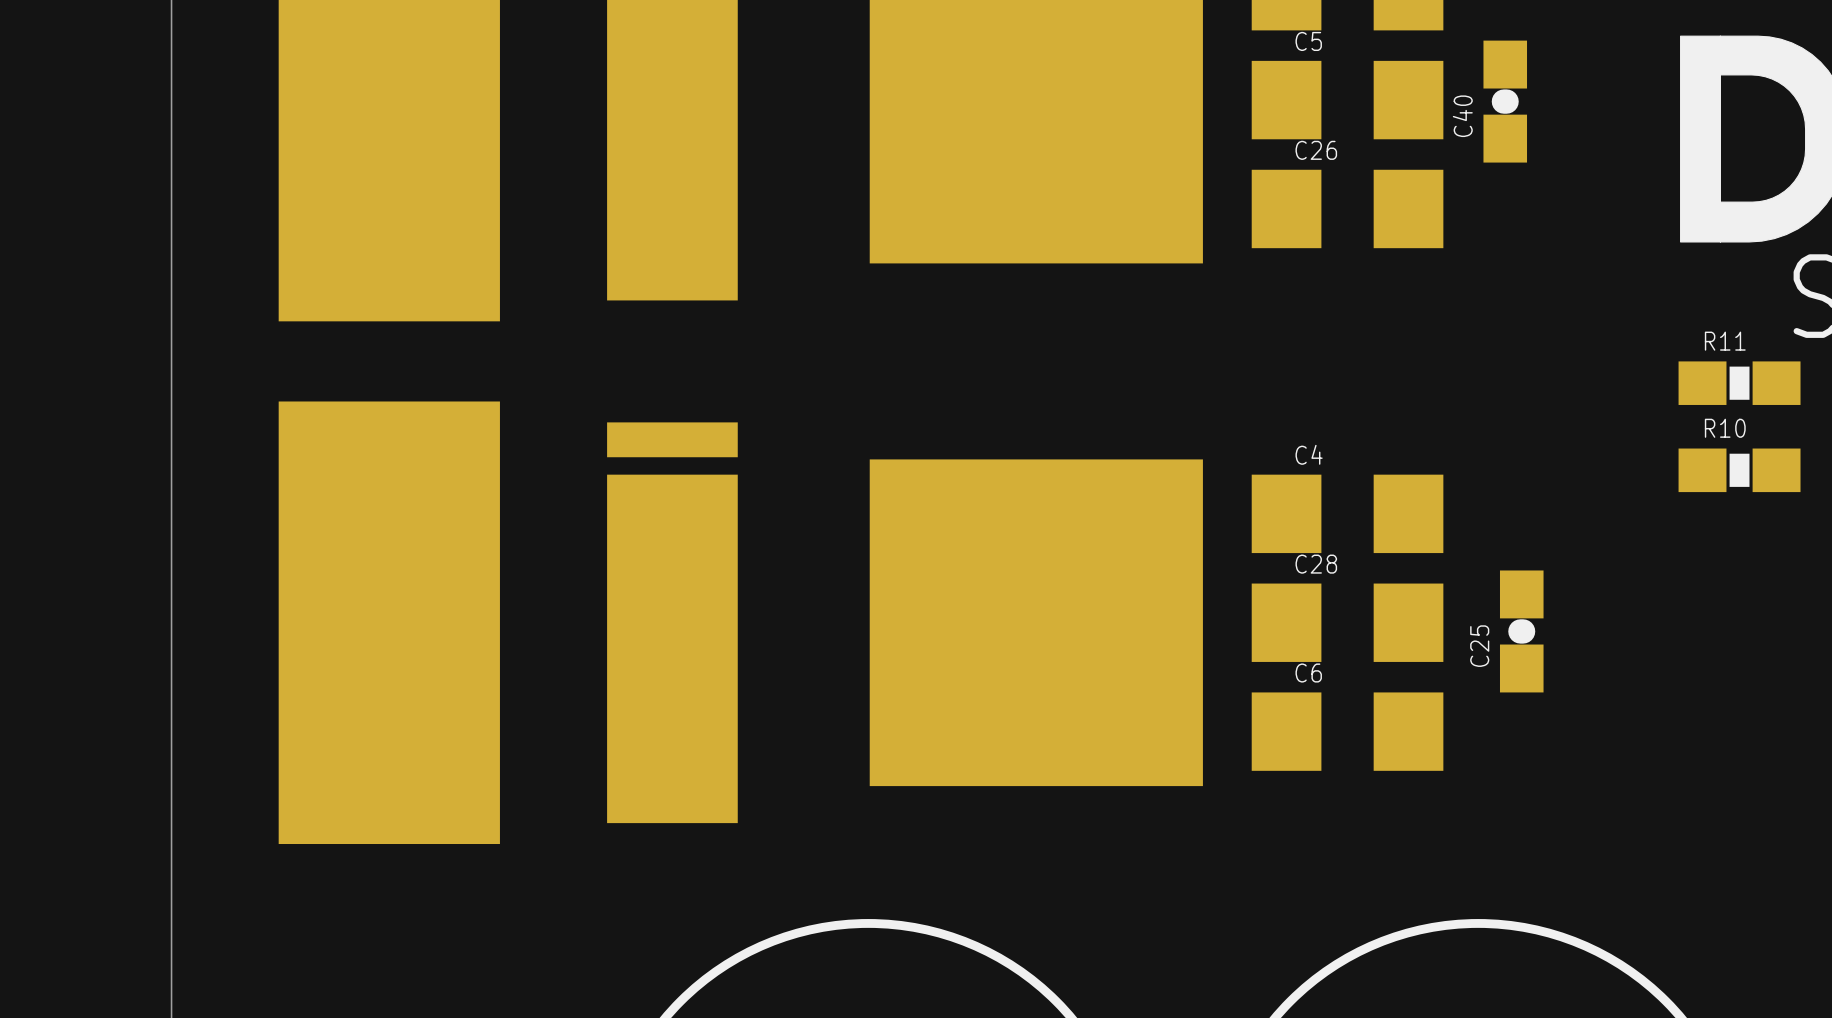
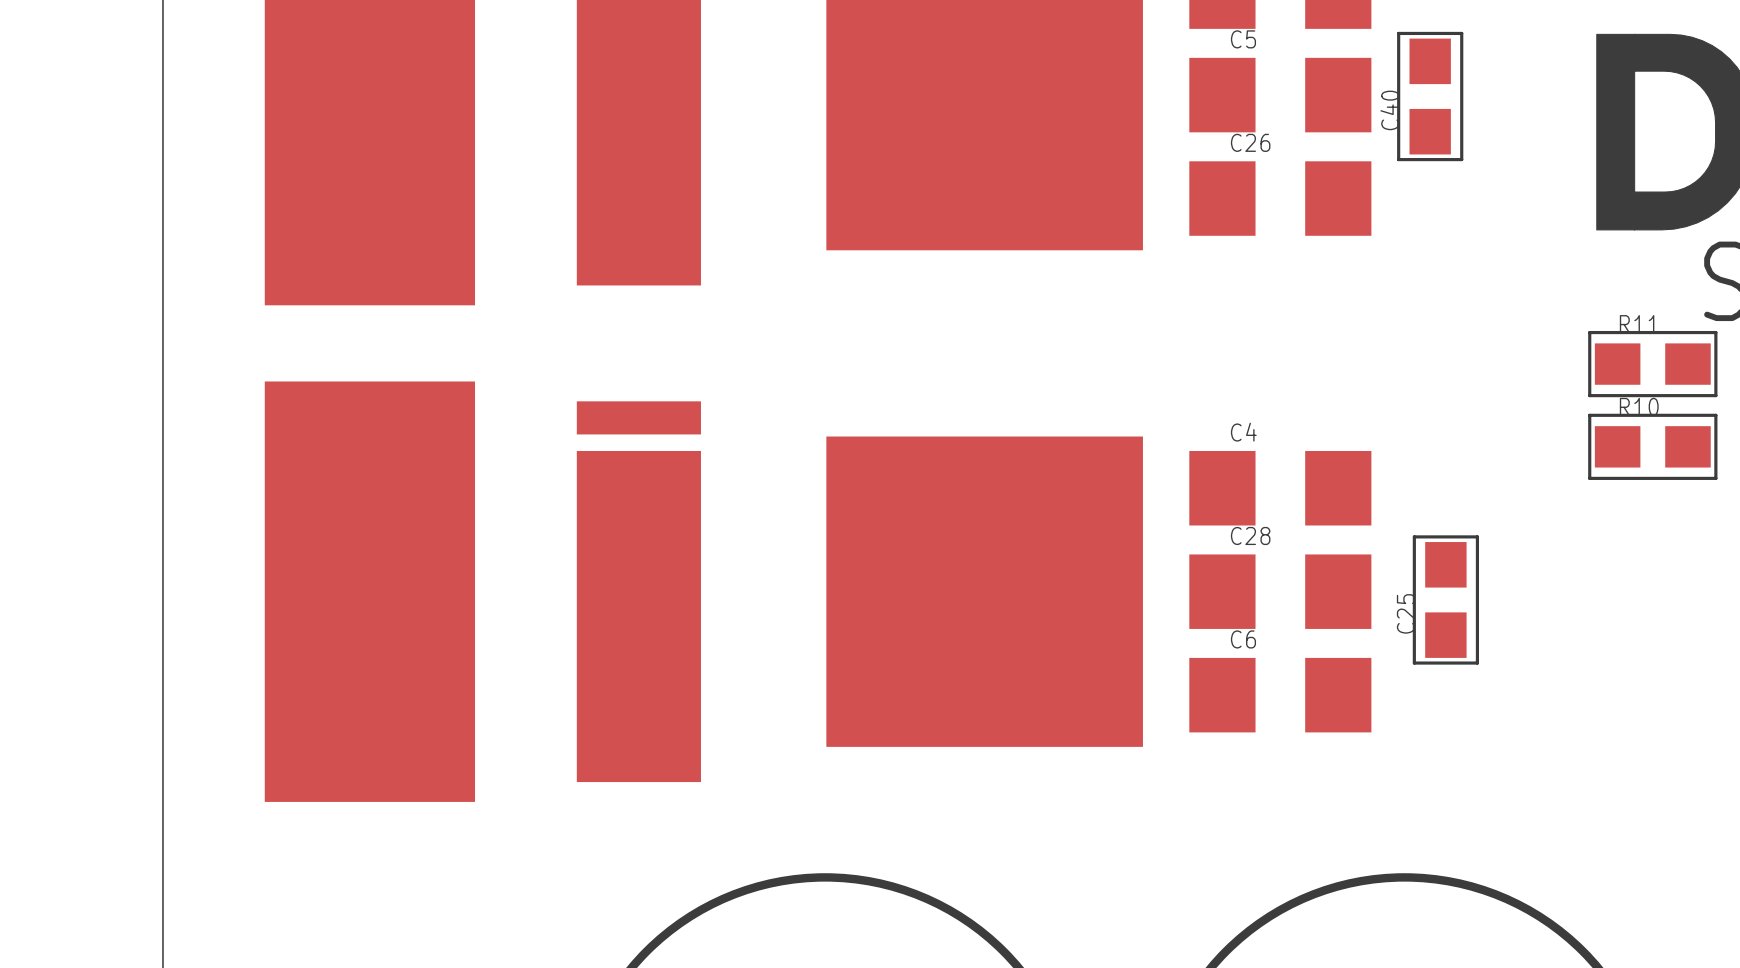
C40 footprint: [1483, 40, 1528, 163] -> [1397, 31, 1464, 162]
R11 footprint: [1678, 361, 1801, 405] -> [1588, 330, 1718, 398]
R10 footprint: [1678, 448, 1801, 493] -> [1588, 413, 1718, 480]
C25 footprint: [1499, 570, 1544, 693] -> [1412, 535, 1479, 665]

